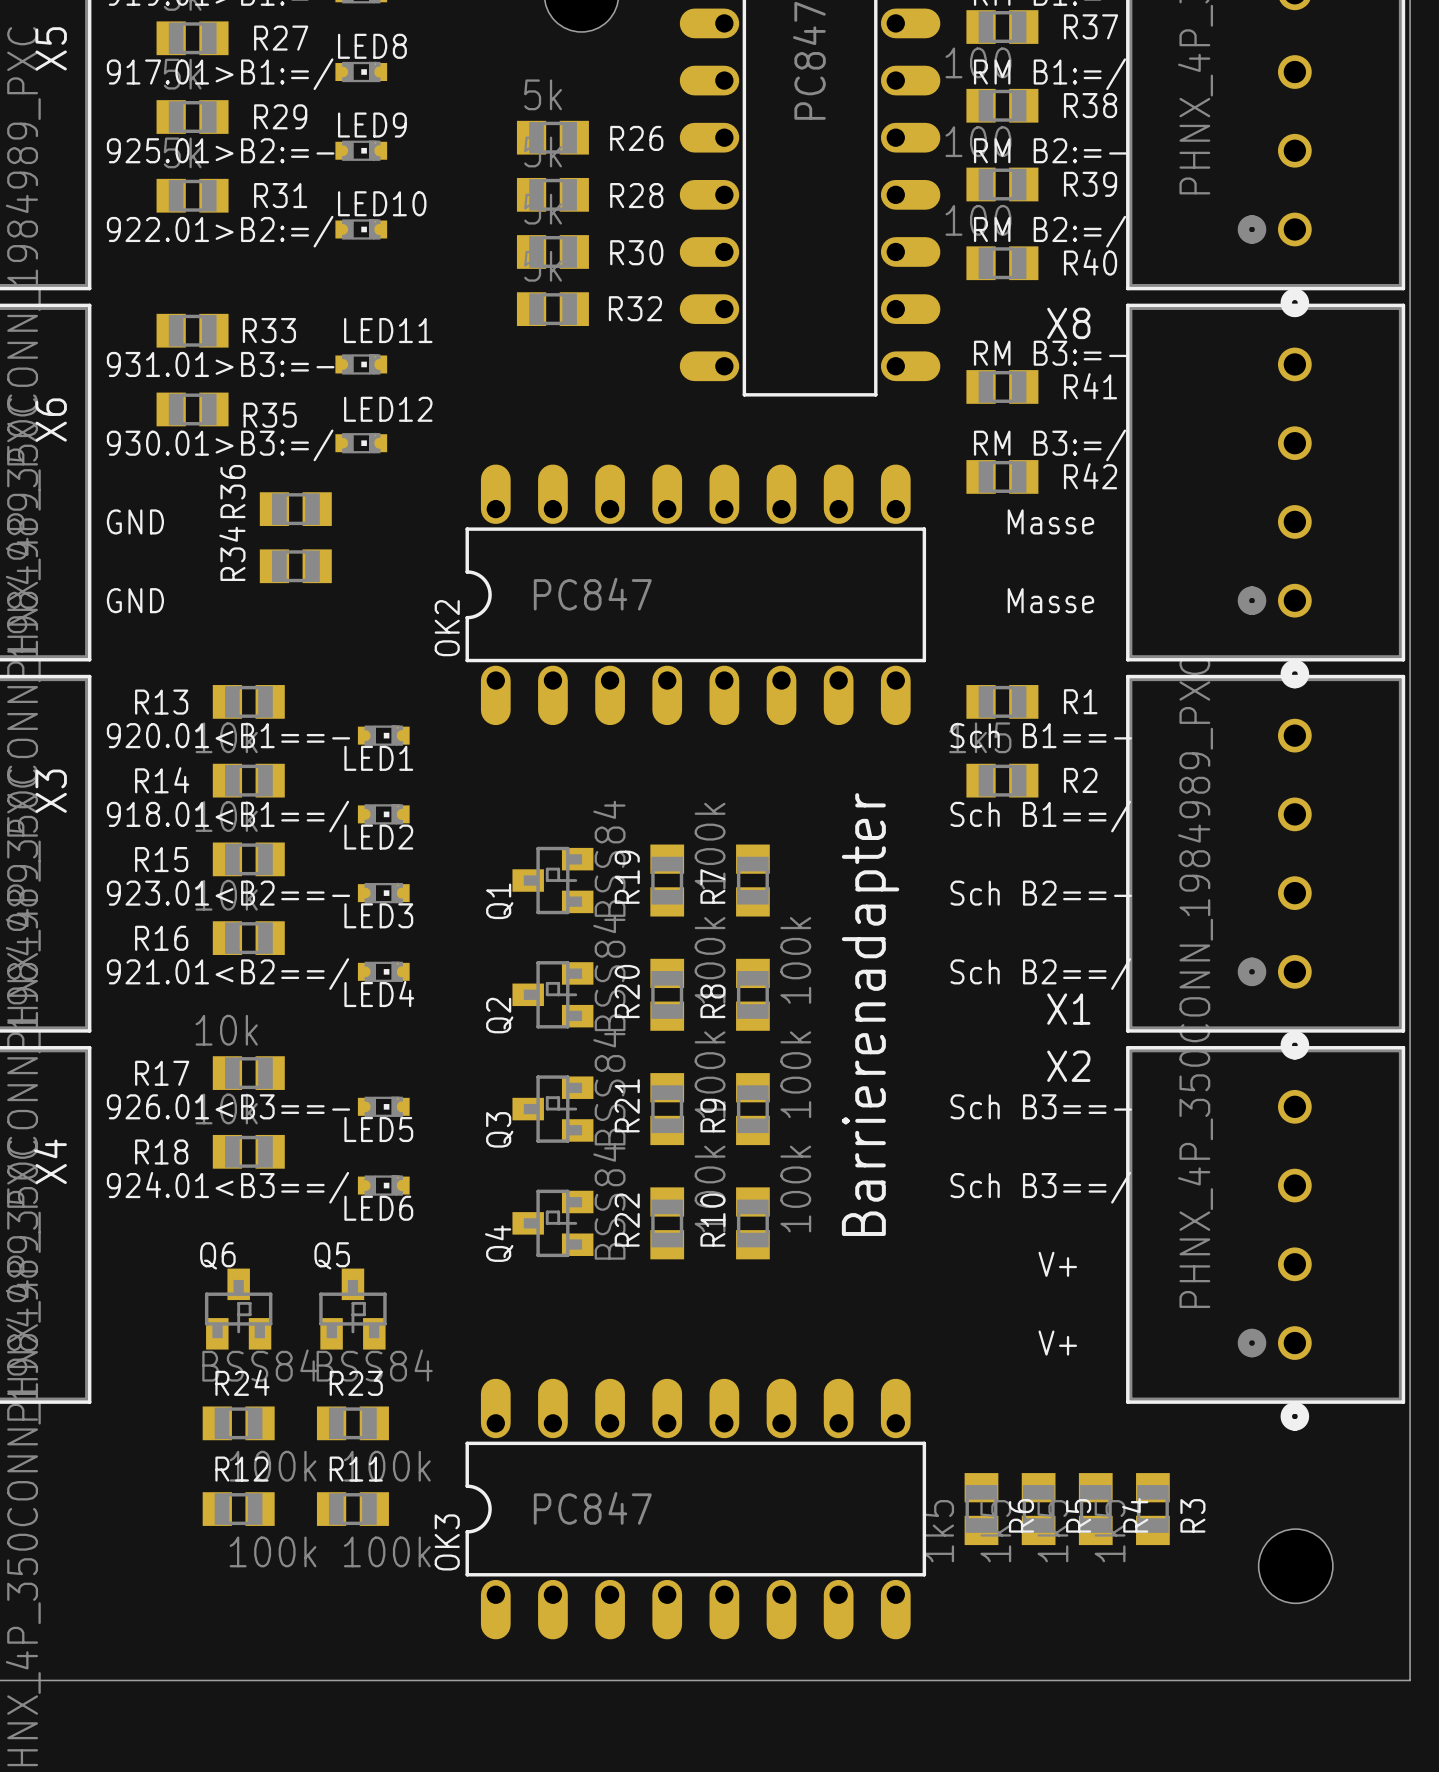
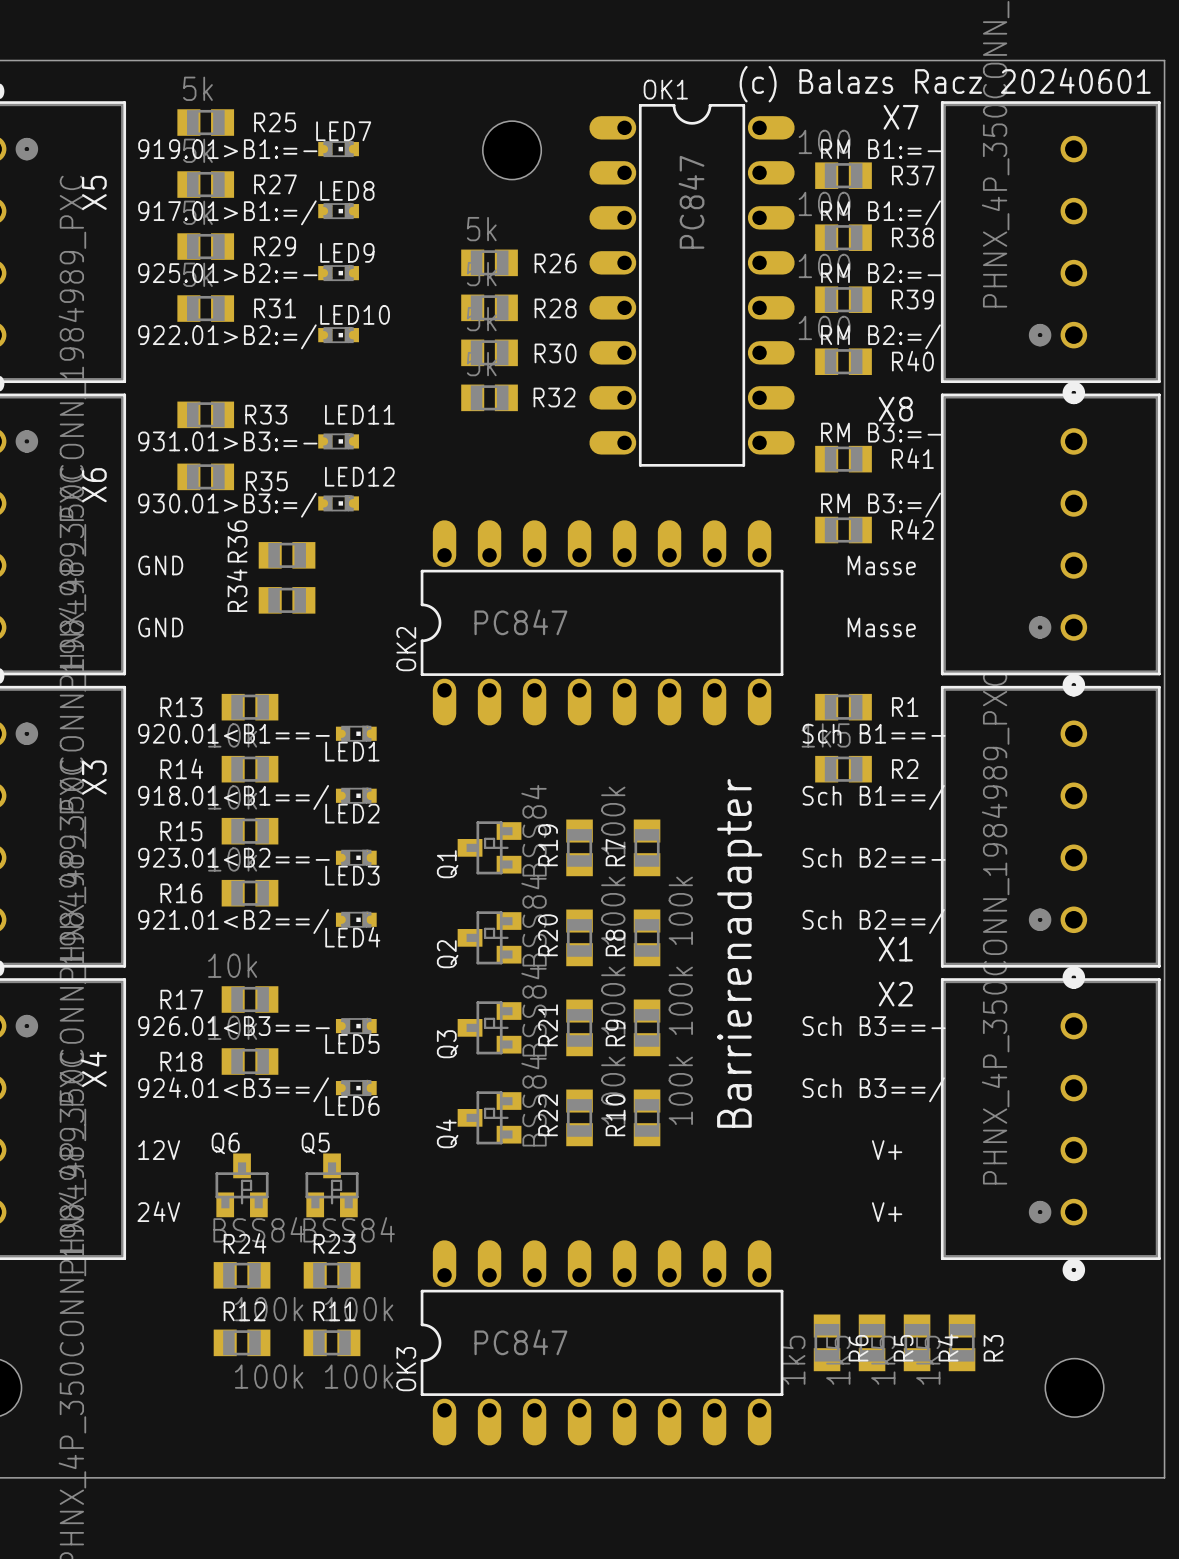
text: none -> 12V (159, 1150)
text: none -> 24V (158, 1211)

